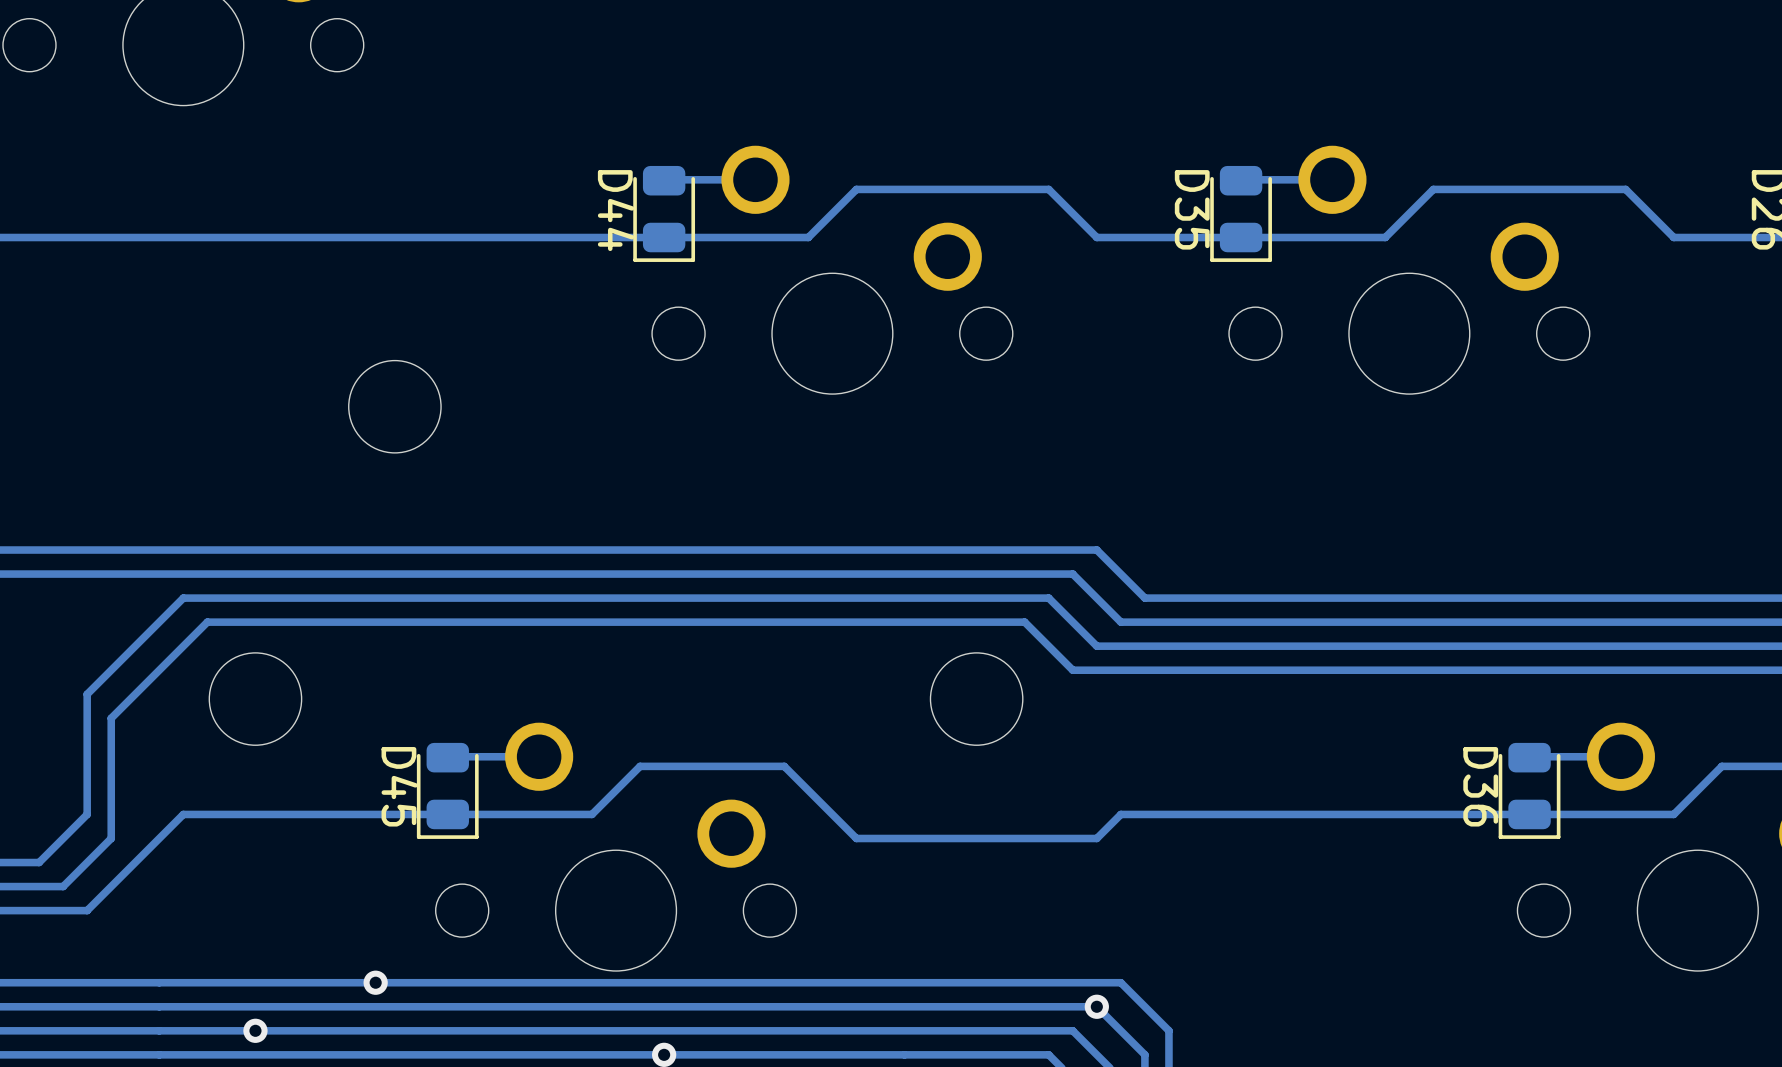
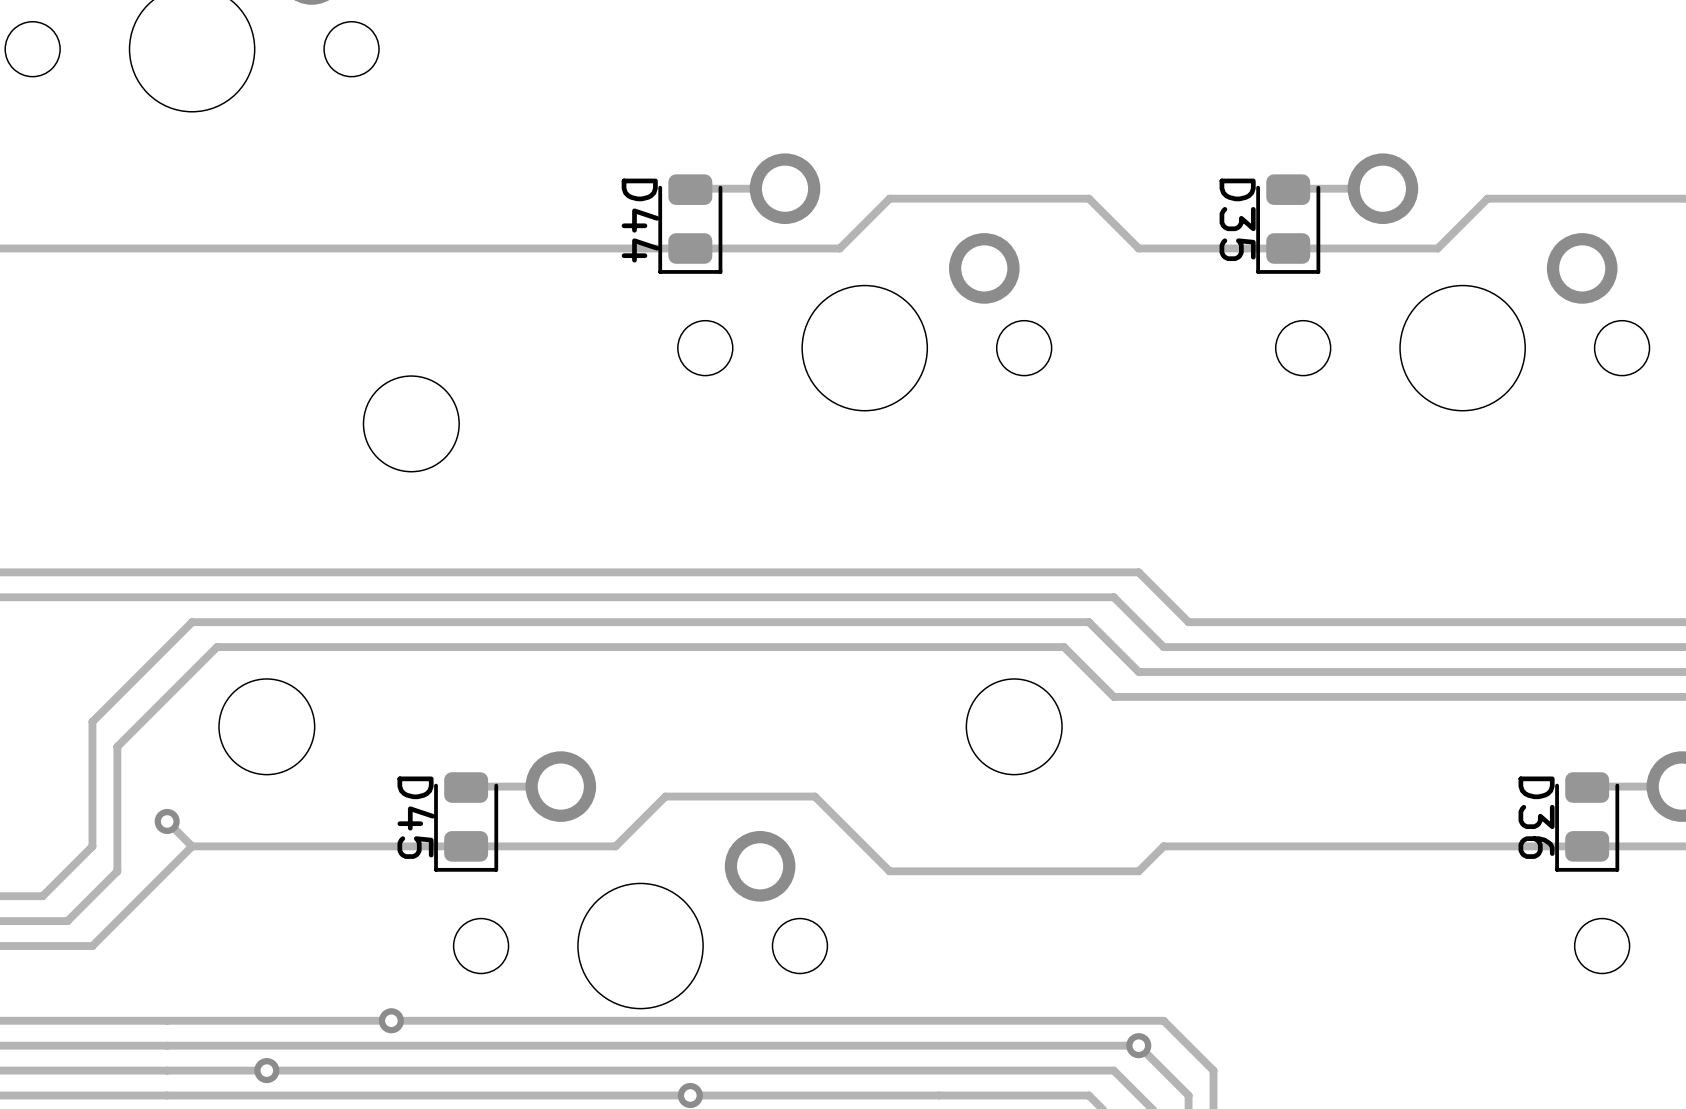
track: none -> (167, 821) (192, 846)
via: none -> (167, 821)

